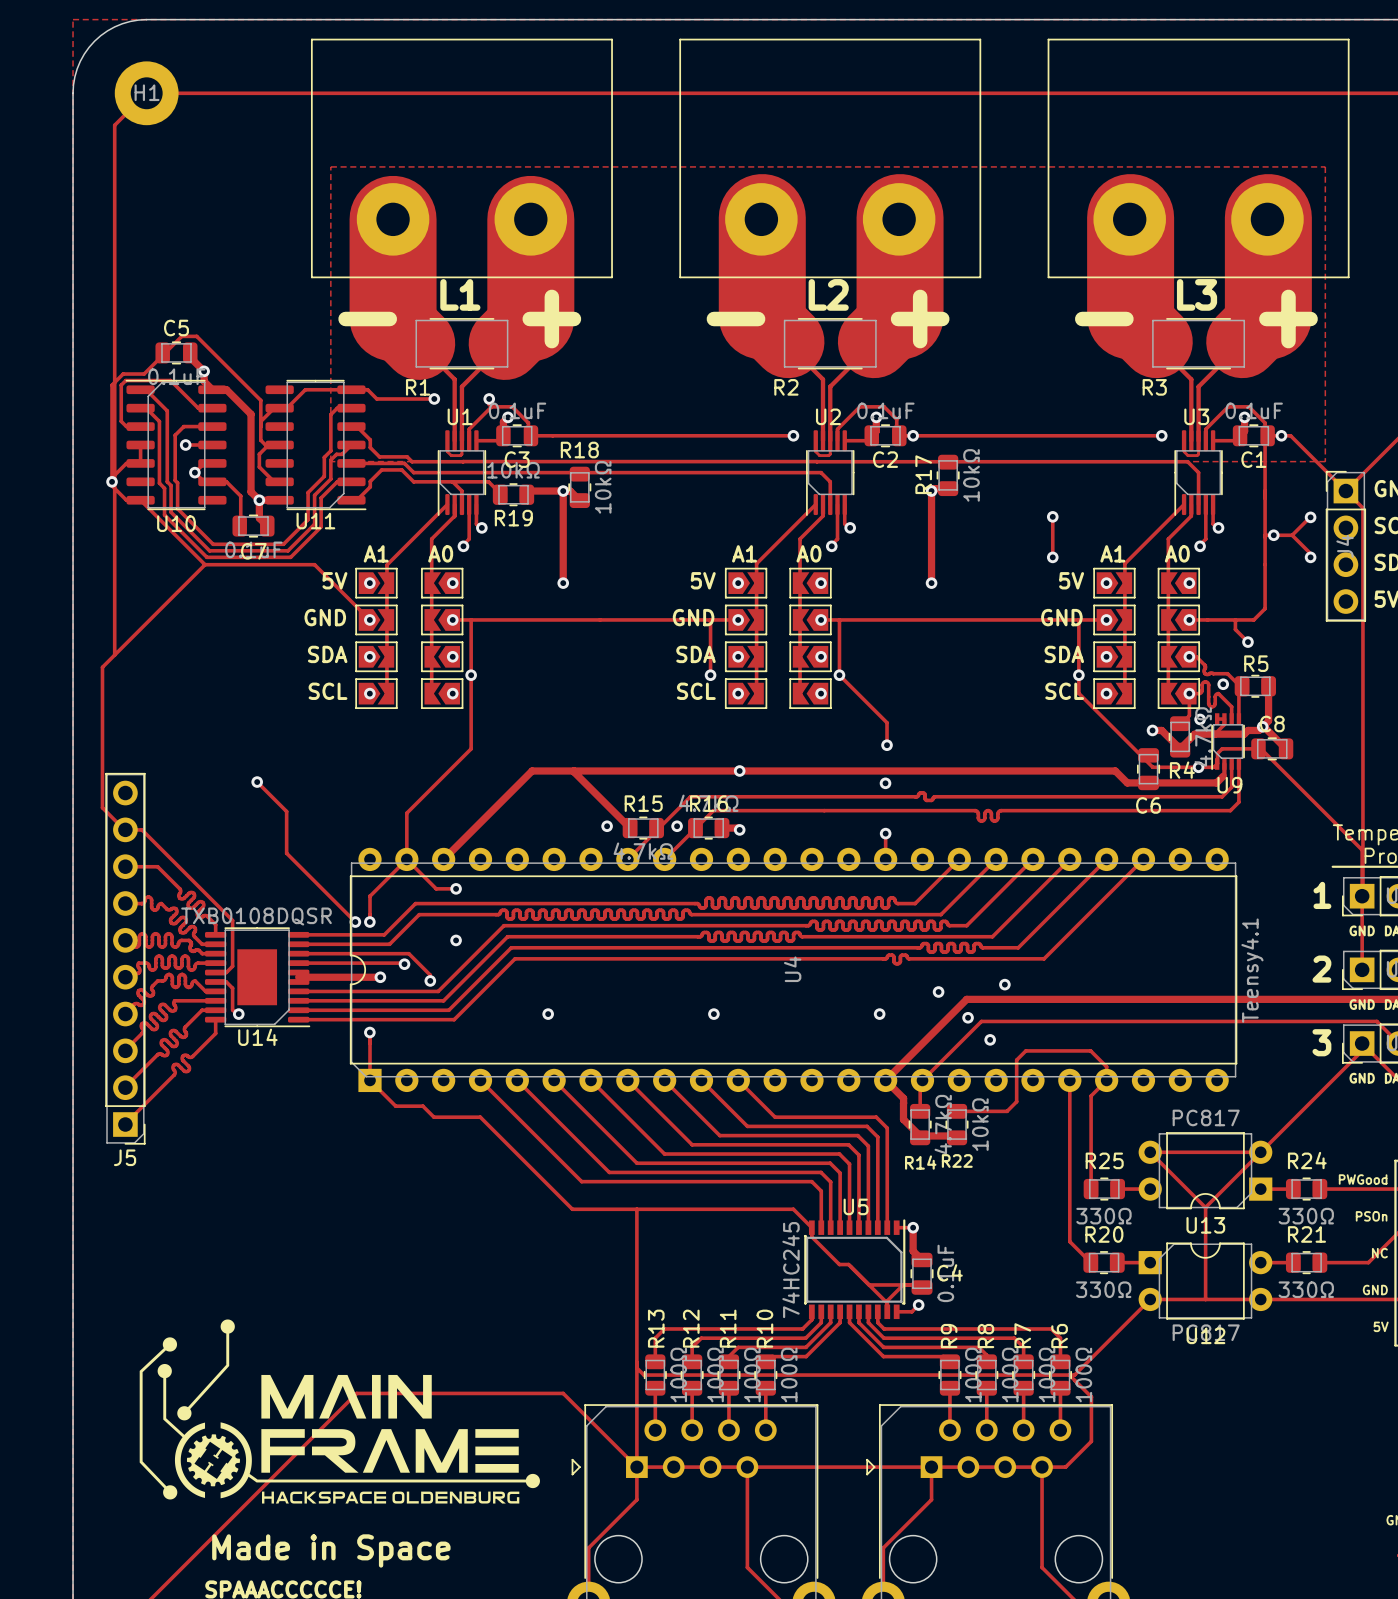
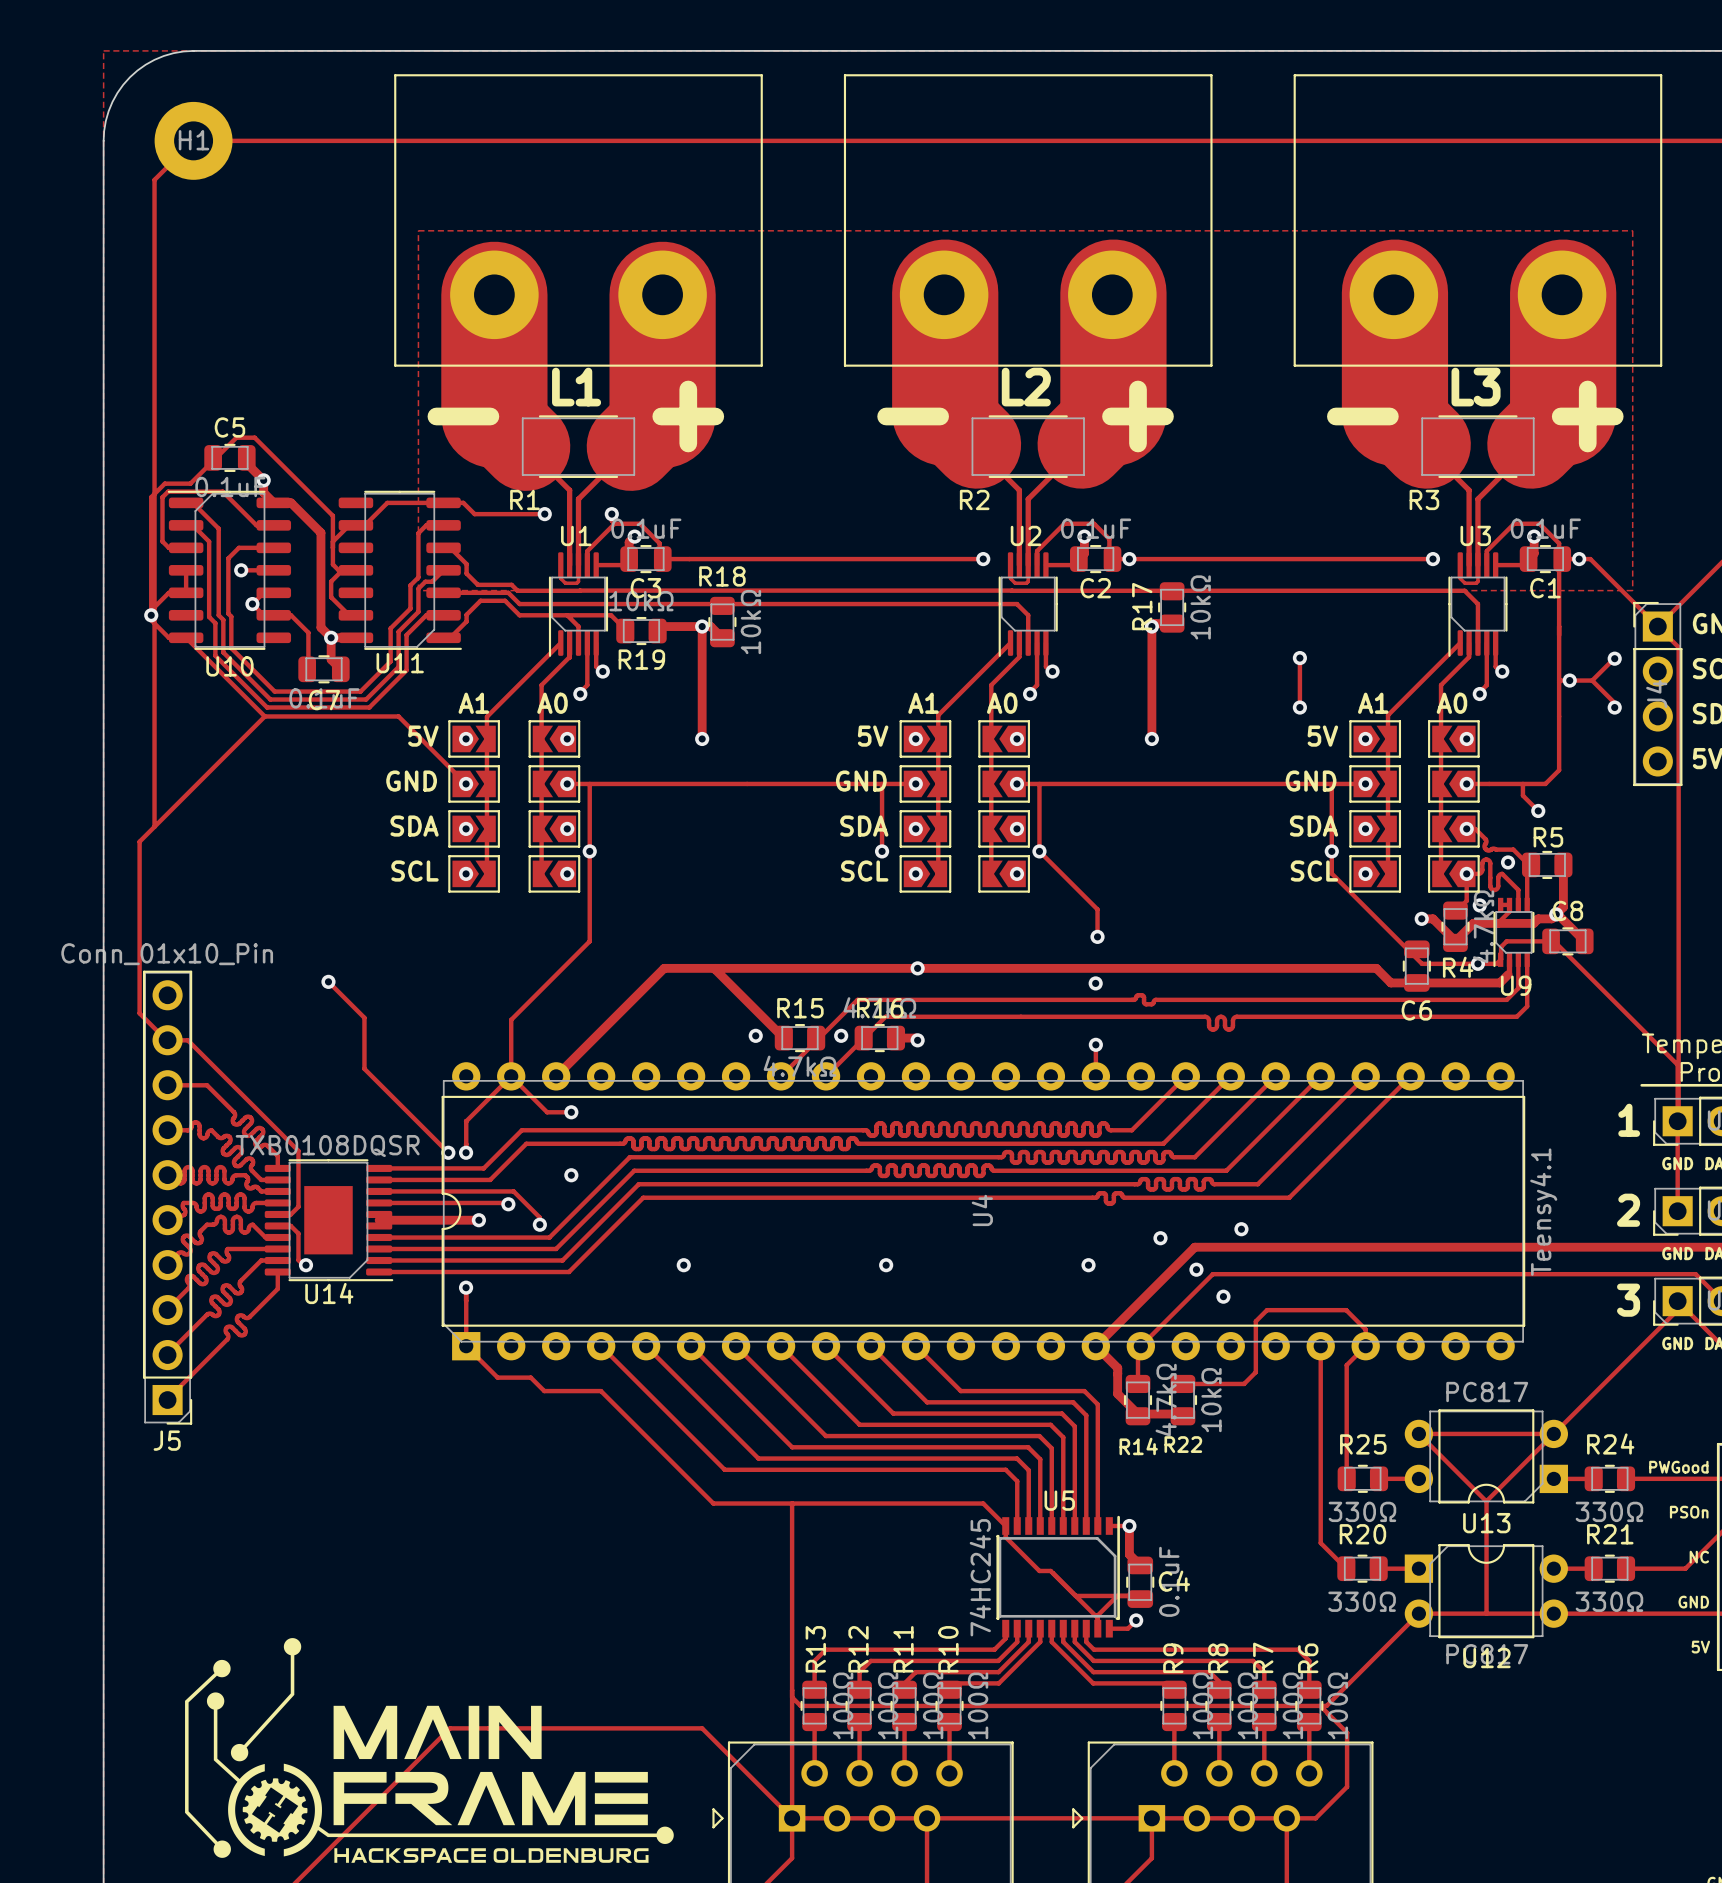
J5 value: none -> Conn_01x10_Pin (167, 954)

